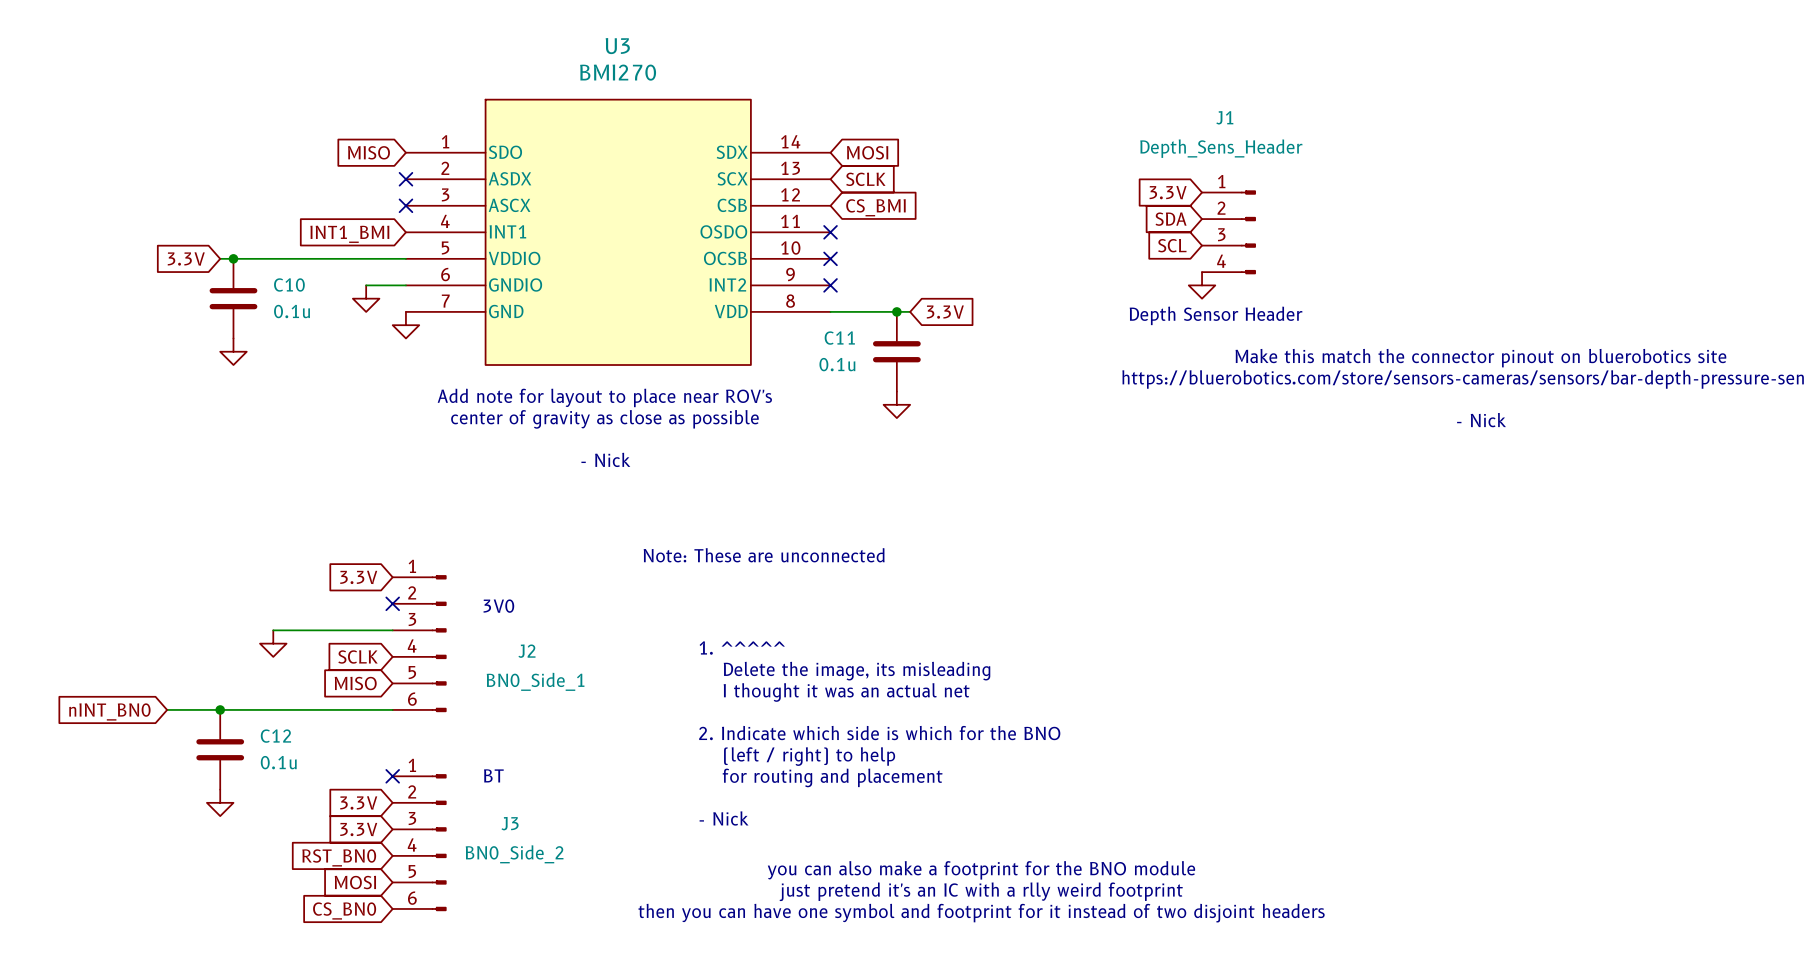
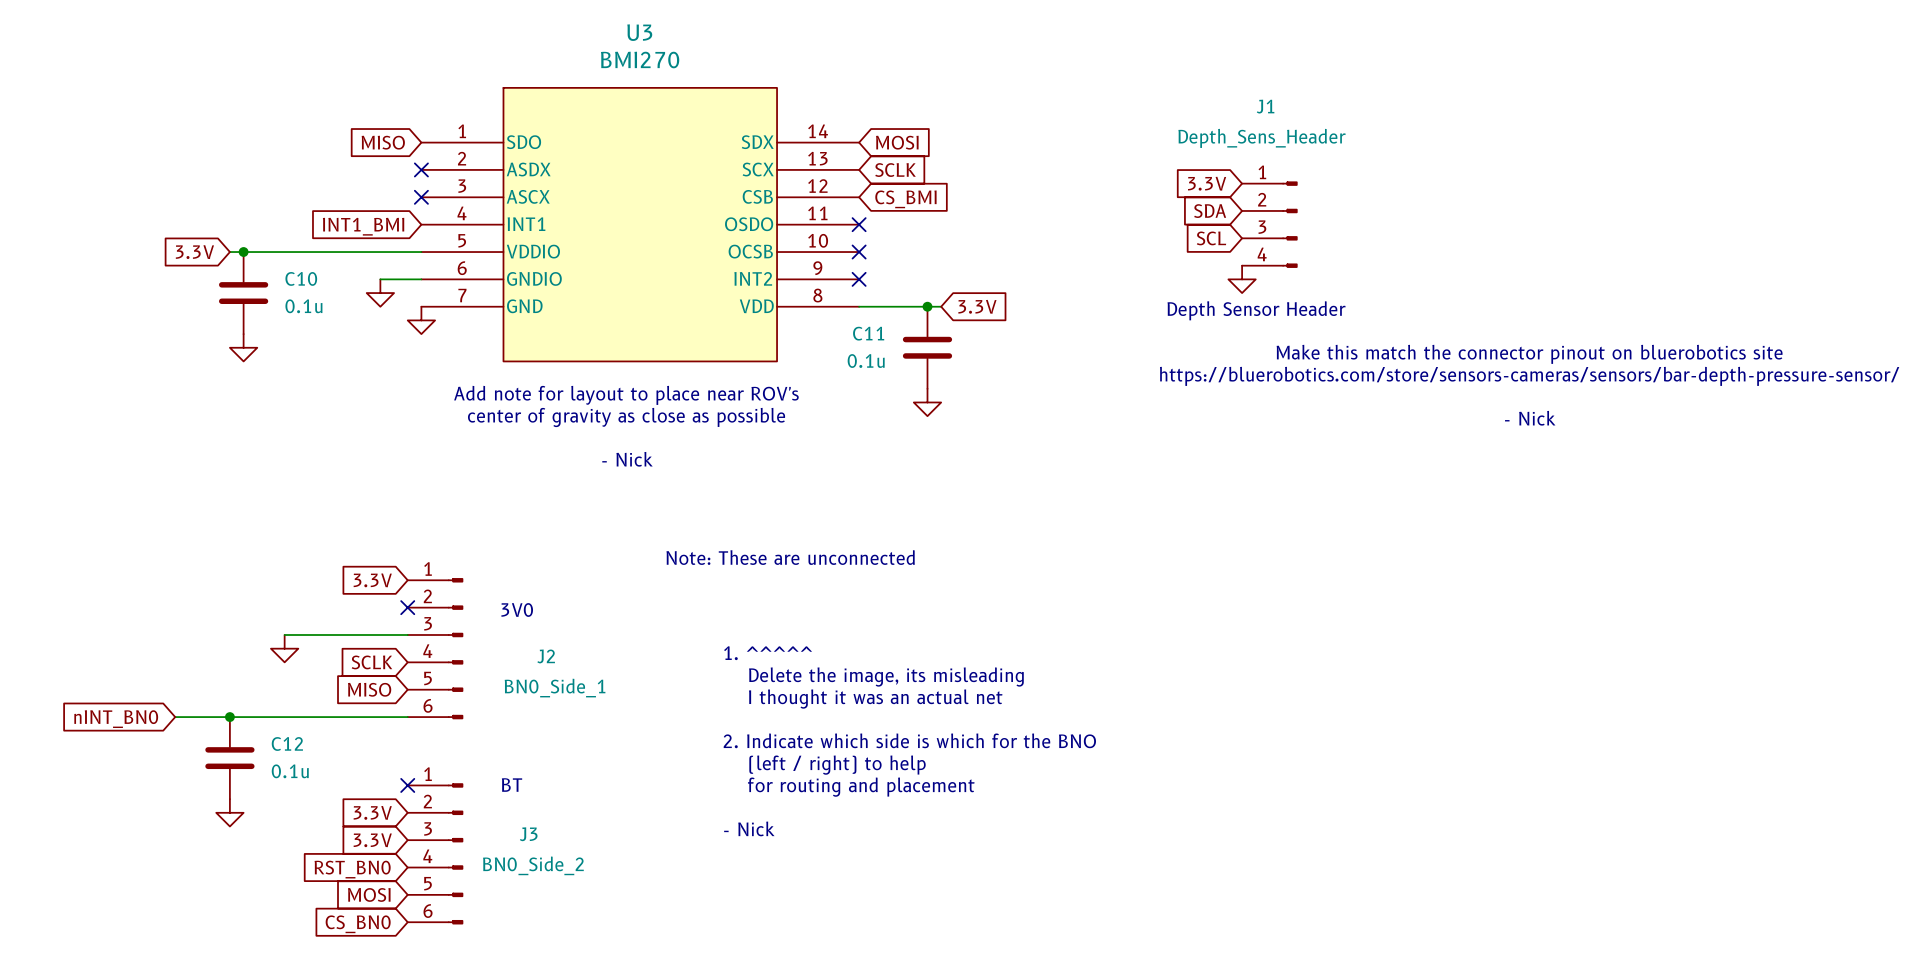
text: you can also make a footprint for the BNO module (981, 870) -> none
text: just pretend it's an IC with a rlly weird footprint (981, 891) -> none
text: then you can have one symbol and footprint for it instead of two disjoint headers (981, 913) -> none

